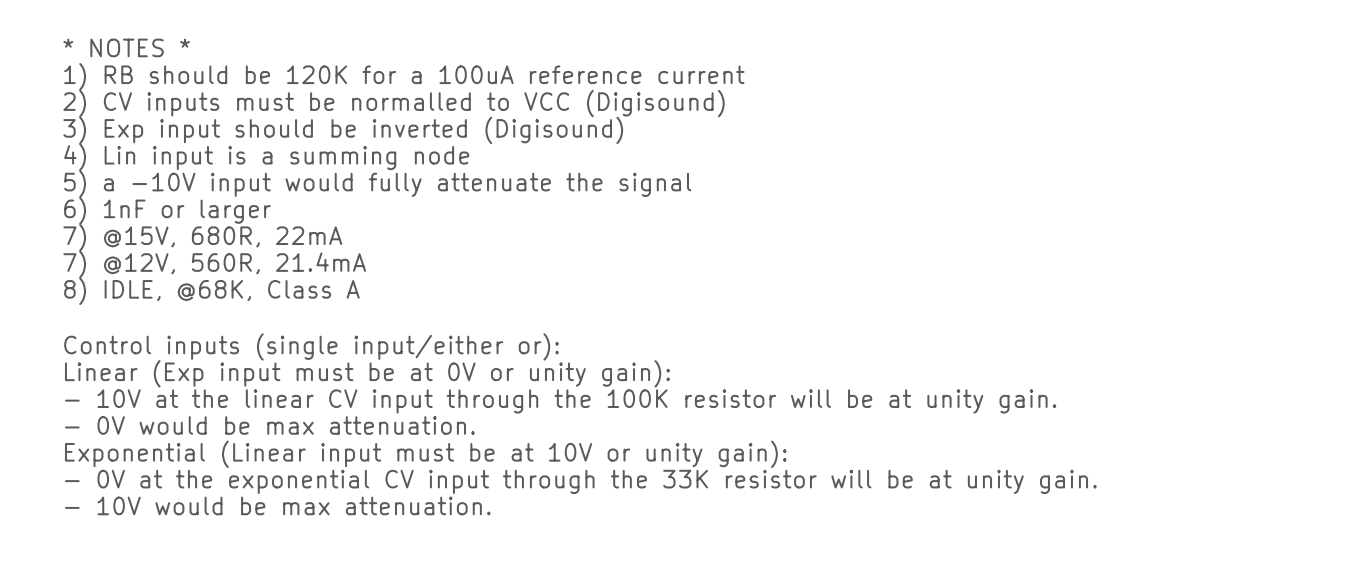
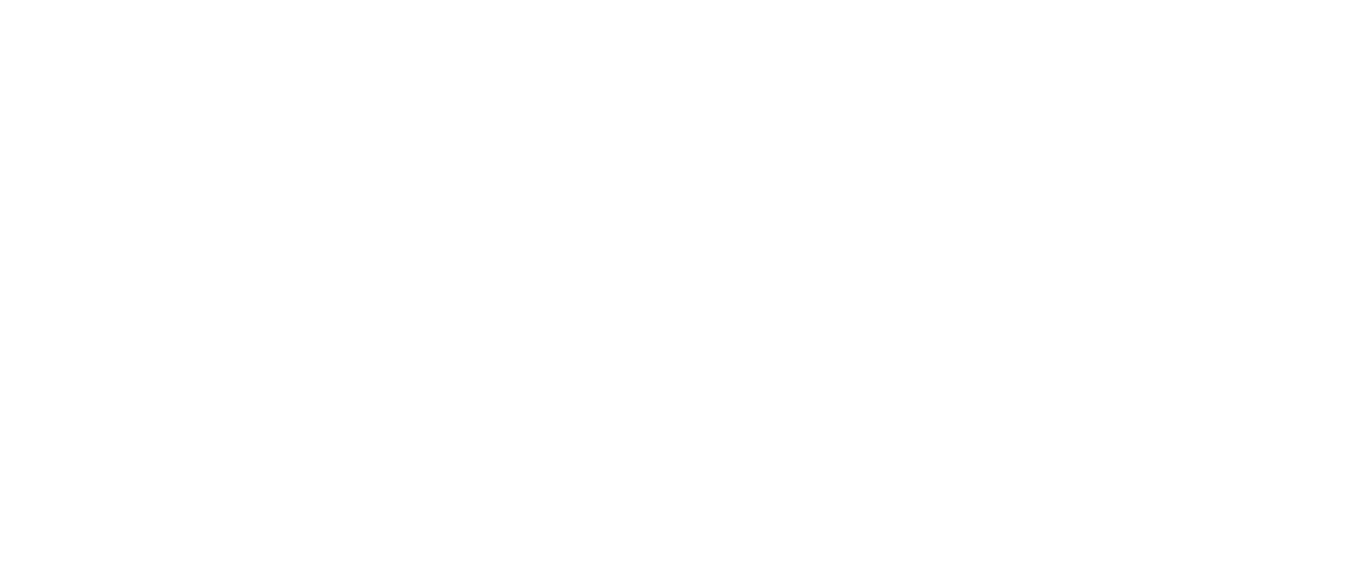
text: * NOTES * (126, 47) -> none
text: 1) RB should be 120K for a 100uA reference current (404, 76) -> none
text: 2) CV inputs must be normalled to VCC (Digisound) (394, 103) -> none
text: 3) Exp input should be inverted (Digisound) (343, 130) -> none
text: 4) Lin input is a summing node (266, 157) -> none
text: 5) a -10V input would fully attenuate the signal (377, 184) -> none
text: 6) 1nF or larger (167, 210) -> none
text: 7) @15V, 680R, 22mA (202, 237) -> none
text: 7) @12V, 560R, 21.4mA (214, 264) -> none
text: 8) IDLE, @68K, Class A (211, 291) -> none
text: Control inputs (single input/either or): (311, 346) -> none
text: Linear (Exp input must be at 0V or unity gain): (367, 373) -> none
text: - 10V at the linear CV input through the 100K resistor will be at unity gain. (560, 401) -> none
text: - 0V would be max attenuation. (269, 425) -> none
text: Exponential (Linear input must be at 10V or unity gain): (425, 454) -> none
text: - 0V at the exponential CV input through the 33K resistor will be at unity gain. (580, 481) -> none
text: - 10V would be max attenuation. (277, 505) -> none

